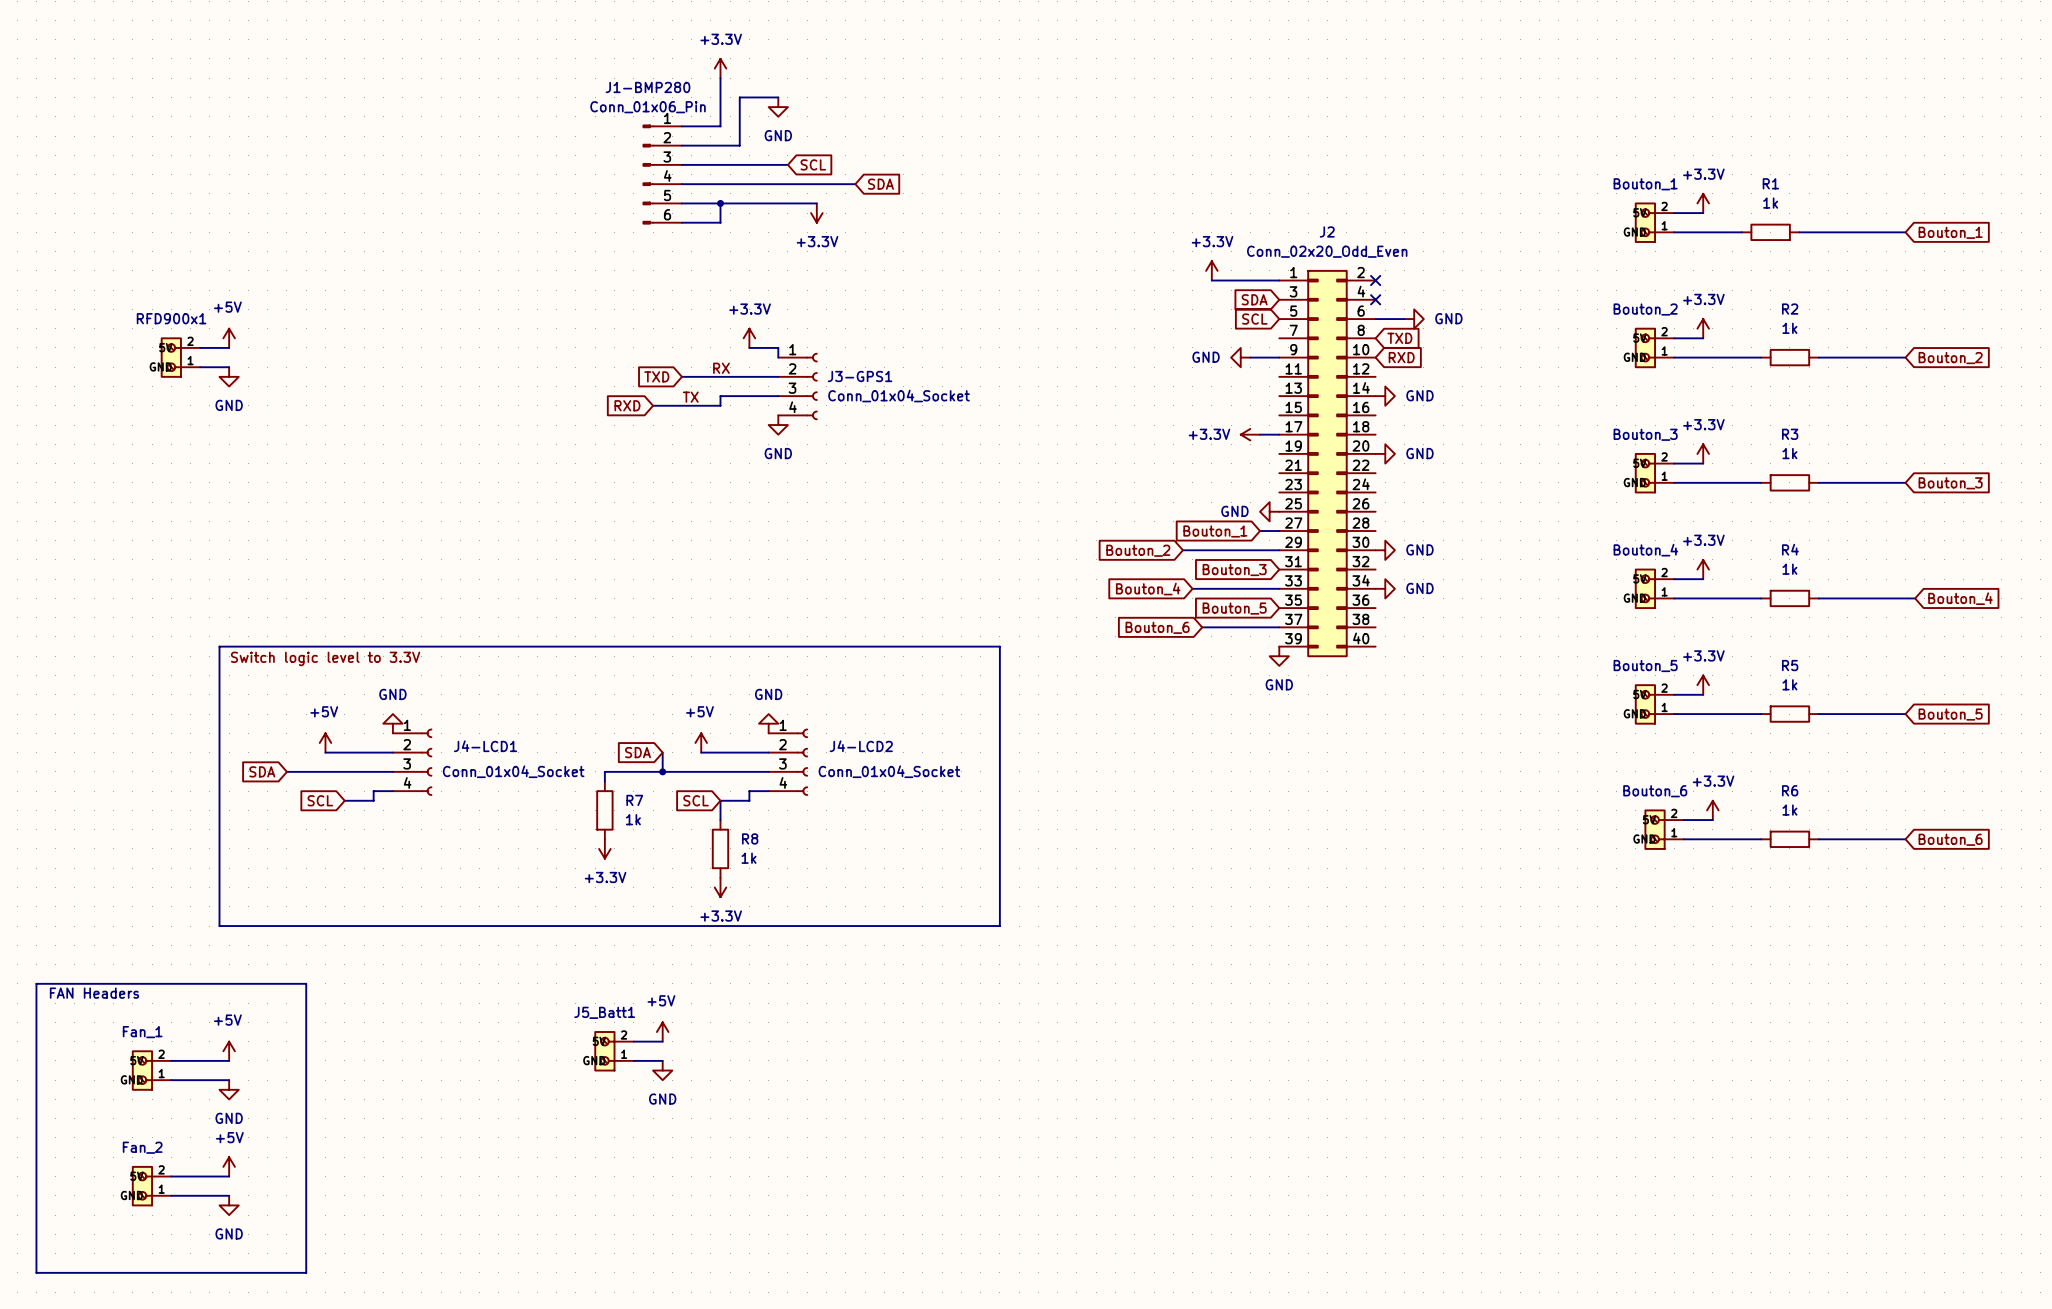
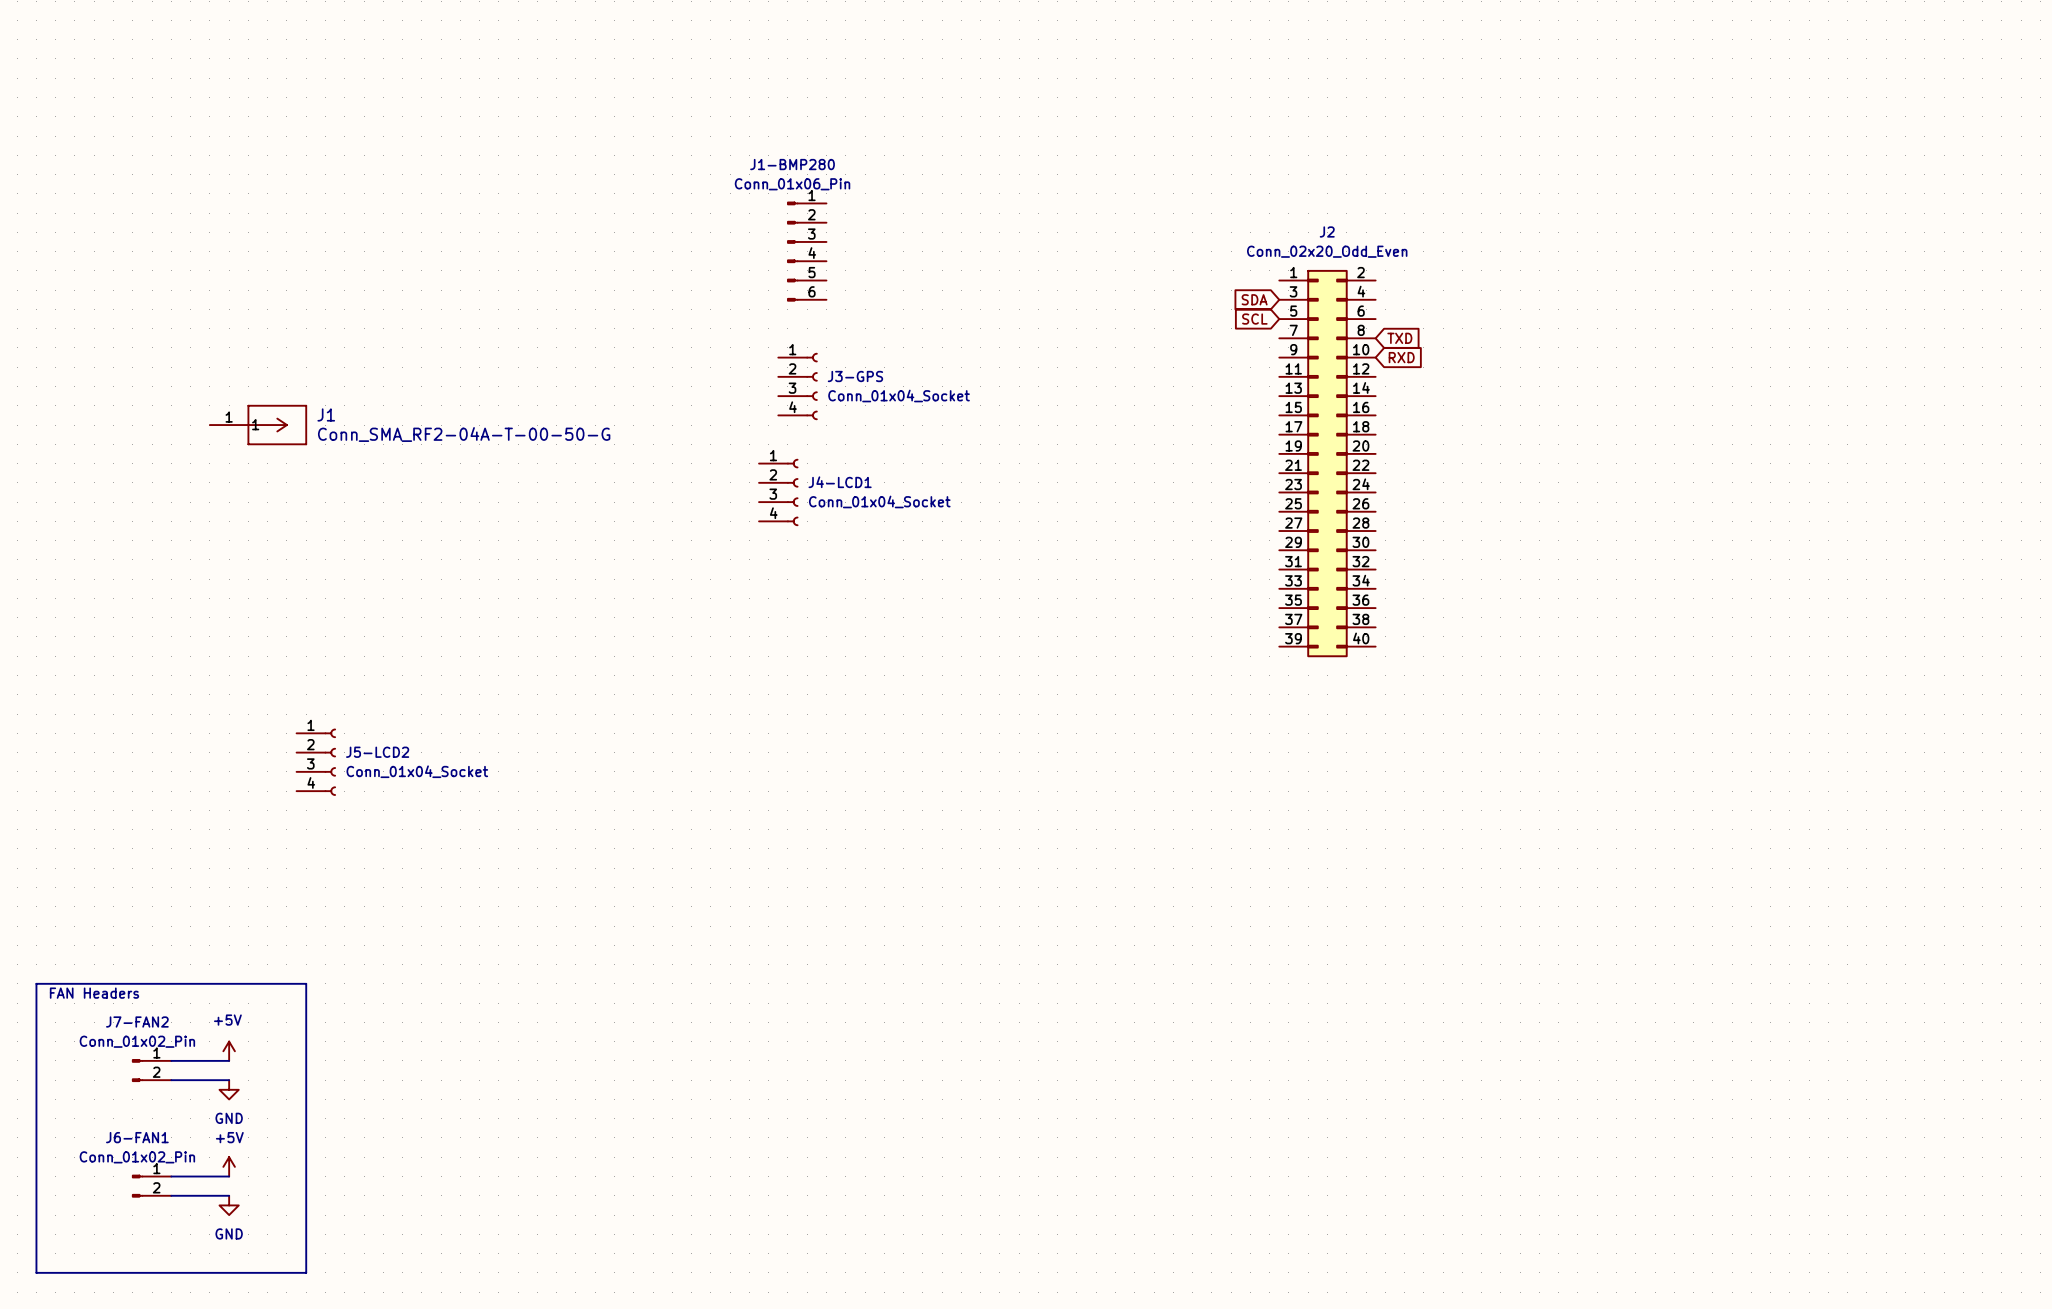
power symbol: +3.3V (720, 68) -> none
wire: (720, 78) (720, 126) (681, 126) -> none
wire: (778, 97) (739, 97) (739, 145) (681, 145) -> none
power symbol: GND (778, 107) -> none
wire: (681, 164) (787, 164) -> none
global label: SCL (813, 164) -> none
J1-BMP280 position: (662, 174) -> (806, 251)
wire: (681, 184) (855, 184) -> none
global label: SDA (880, 184) -> none
wire: (681, 203) (816, 203) -> none
wire: (720, 203) (720, 222) (681, 222) -> none
junction: (720, 203) -> none
power symbol: +3.3V (1703, 203) -> none
power symbol: +3.3V (816, 213) -> none
wire: (1674, 213) (1703, 213) -> none
Bouton_1: (1654, 222) -> none
wire: (1674, 232) (1741, 232) -> none
R1: 1k (1770, 232) -> none
wire: (1799, 232) (1905, 232) -> none
global label: Bouton_1 (1950, 232) -> none
power symbol: +3.3V (1211, 270) -> none
wire: (1211, 280) (1279, 280) -> none
no-connect mark: (1375, 280) -> none
no-connect mark: (1375, 299) -> none
wire: (1375, 319) (1404, 319) -> none
power symbol: GND (1414, 319) -> none
power symbol: +3.3V (1703, 328) -> none
power symbol: +5V (229, 338) -> none
power symbol: +3.3V (749, 338) -> none
wire: (1674, 338) (1703, 338) -> none
wire: (200, 347) (229, 347) -> none
wire: (749, 347) (778, 347) (778, 357) -> none
Bouton_2: (1654, 347) -> none
RFD900x1: (180, 357) -> none
power symbol: GND (1240, 357) -> none
wire: (1250, 357) (1279, 357) -> none
wire: (1674, 357) (1761, 357) -> none
R2: 1k (1789, 357) -> none
wire: (1818, 357) (1905, 357) -> none
global label: Bouton_2 (1950, 358) -> none
wire: (200, 367) (229, 367) -> none
label: RX (721, 368) -> none
power symbol: GND (229, 376) -> none
global label: TXD (656, 376) -> none
wire: (681, 376) (778, 376) -> none
J3-GPS1 name: J3-GPS1 (860, 376) -> J3-GPS (855, 376)
wire: (778, 396) (720, 396) (720, 405) (653, 405) -> none
power symbol: GND (1385, 396) -> none
label: TX (690, 397) -> none
global label: RXD (627, 405) -> none
J1: none -> Conn_SMA_RF2-04A-T-00-50-G (258, 425)
power symbol: GND (778, 425) -> none
power symbol: +3.3V (1250, 434) -> none
wire: (1260, 434) (1279, 434) -> none
power symbol: GND (1385, 453) -> none
power symbol: +3.3V (1703, 453) -> none
wire: (1674, 463) (1703, 463) -> none
Bouton_3: (1654, 473) -> none
wire: (1674, 482) (1761, 482) -> none
R3: 1k (1789, 482) -> none
wire: (1818, 482) (1905, 482) -> none
global label: Bouton_3 (1950, 483) -> none
power symbol: GND (1269, 511) -> none
global label: Bouton_1 (1215, 531) -> none
wire: (1260, 531) (1279, 531) -> none
global label: Bouton_2 (1138, 550) -> none
wire: (1182, 550) (1279, 550) -> none
power symbol: GND (1385, 550) -> none
power symbol: +3.3V (1703, 569) -> none
global label: Bouton_3 (1234, 570) -> none
wire: (1674, 579) (1703, 579) -> none
wire: (1192, 588) (1279, 588) -> none
power symbol: GND (1385, 588) -> none
Bouton_4: (1654, 588) -> none
global label: Bouton_4 (1148, 589) -> none
wire: (1674, 598) (1761, 598) -> none
R4: 1k (1789, 598) -> none
wire: (1818, 598) (1915, 598) -> none
global label: Bouton_4 (1960, 598) -> none
global label: Bouton_5 (1234, 608) -> none
global label: Bouton_6 (1157, 627) -> none
wire: (1202, 627) (1279, 627) -> none
line: (219, 646) (999, 646) (999, 926) (219, 926) (219, 646) -> none
power symbol: GND (1279, 656) -> none
label: Switch logic level to 3.3V (325, 658) -> none
power symbol: +3.3V (1703, 685) -> none
wire: (1674, 694) (1703, 694) -> none
Bouton_5: (1654, 704) -> none
wire: (1674, 714) (1761, 714) -> none
R5: 1k (1789, 714) -> none
wire: (1818, 714) (1905, 714) -> none
global label: Bouton_5 (1950, 714) -> none
power symbol: GND (392, 723) -> none
power symbol: GND (768, 723) -> none
power symbol: +5V (325, 742) -> none
power symbol: +5V (701, 742) -> none
J4-LCD1 name position: J4-LCD1 (485, 746) -> J4-LCD1 (840, 482)
wire: (325, 752) (392, 752) -> none
global label: SDA (638, 752) -> none
wire: (662, 752) (662, 771) -> none
wire: (701, 752) (768, 752) -> none
J5-LCD2: none -> Conn_01x04_Socket (316, 762)
J4-LCD1 position: (412, 762) -> (778, 492)
J4-LCD2: Conn_01x04_Socket (788, 762) -> none
global label: SDA (262, 771) -> none
wire: (286, 771) (392, 771) -> none
junction: (662, 771) -> none
wire: (768, 771) (604, 771) (604, 781) -> none
wire: (392, 791) (373, 791) (373, 800) (344, 800) -> none
wire: (768, 791) (749, 791) (749, 800) (720, 800) (720, 820) -> none
global label: SCL (320, 800) -> none
global label: SCL (696, 800) -> none
R7: 1k (604, 810) -> none
power symbol: +3.3V (1712, 810) -> none
wire: (1683, 820) (1712, 820) -> none
Bouton_6: (1664, 829) -> none
wire: (1683, 839) (1761, 839) -> none
R6: 1k (1789, 839) -> none
wire: (1818, 839) (1905, 839) -> none
global label: Bouton_6 (1950, 839) -> none
power symbol: +3.3V (604, 848) -> none
R8: 1k (720, 848) -> none
power symbol: +3.3V (720, 887) -> none
power symbol: +5V (662, 1032) -> none
wire: (633, 1041) (662, 1041) -> none
J5_Batt1: (614, 1051) -> none
wire: (633, 1060) (662, 1060) -> none
Fan_1: (151, 1070) -> none
J7-FAN2: none -> Conn_01x02_Pin (151, 1070)
power symbol: GND (662, 1070) -> none
Fan_2: (151, 1186) -> none
J6-FAN1: none -> Conn_01x02_Pin (151, 1186)

